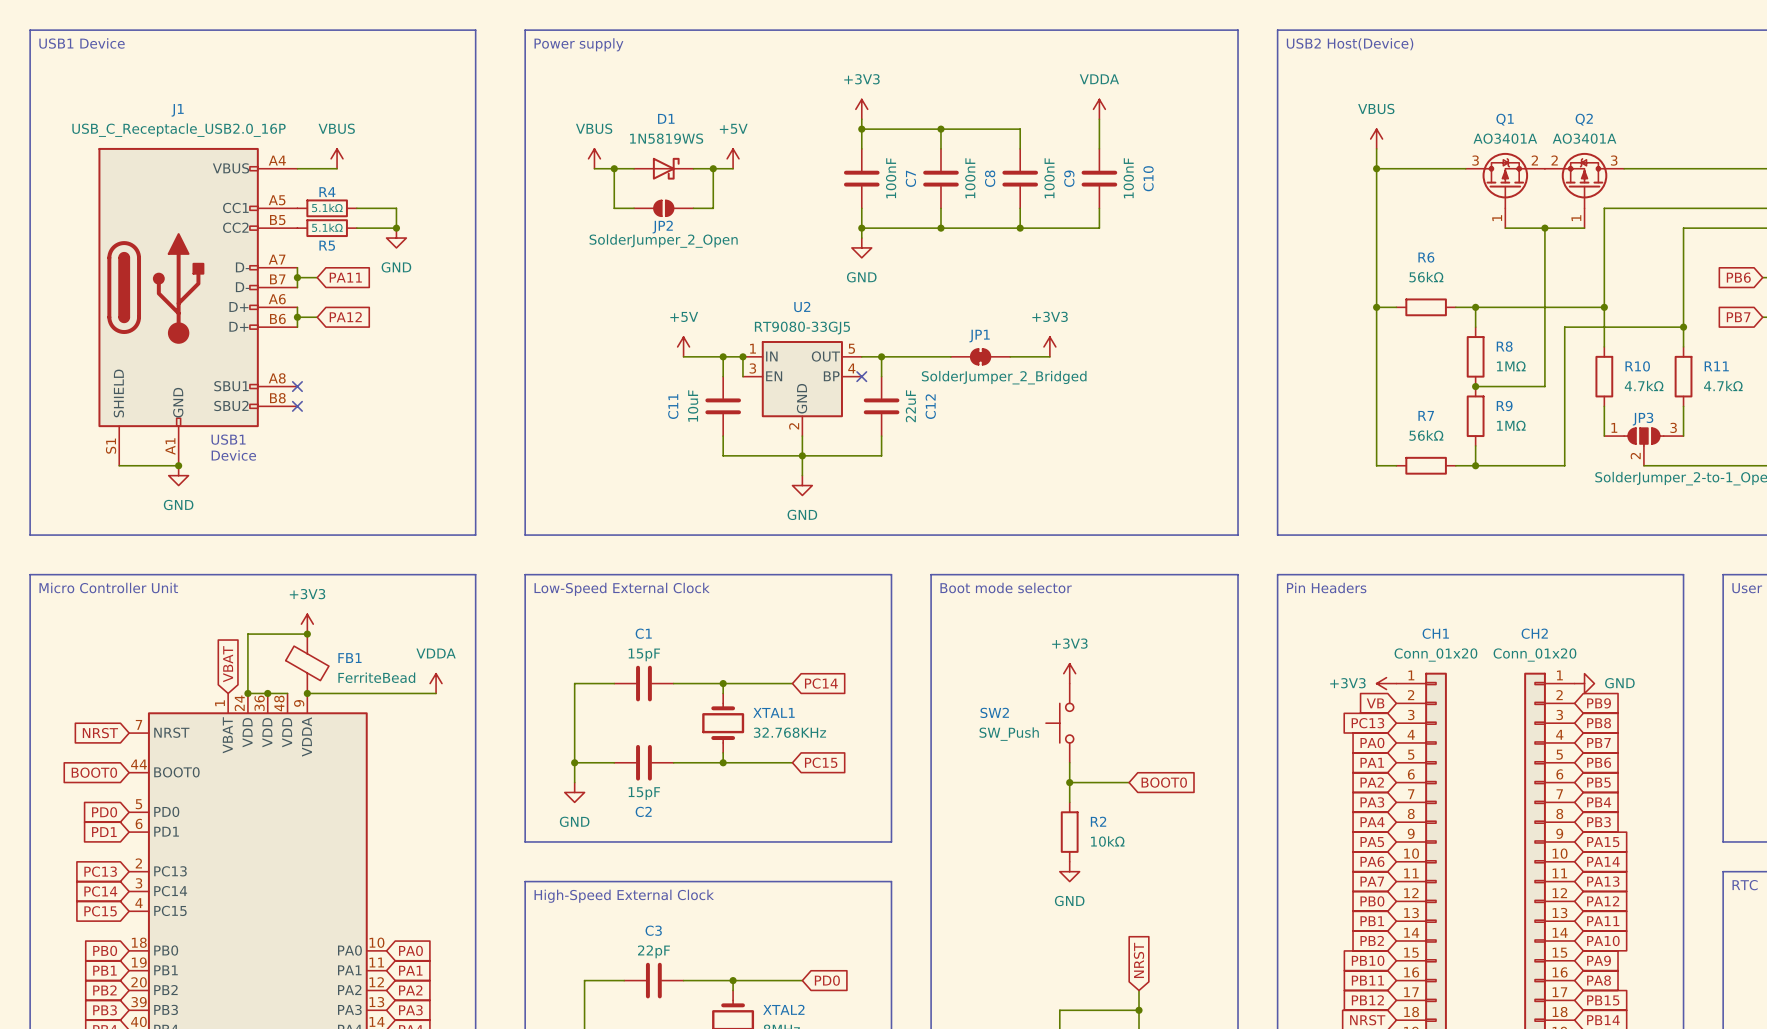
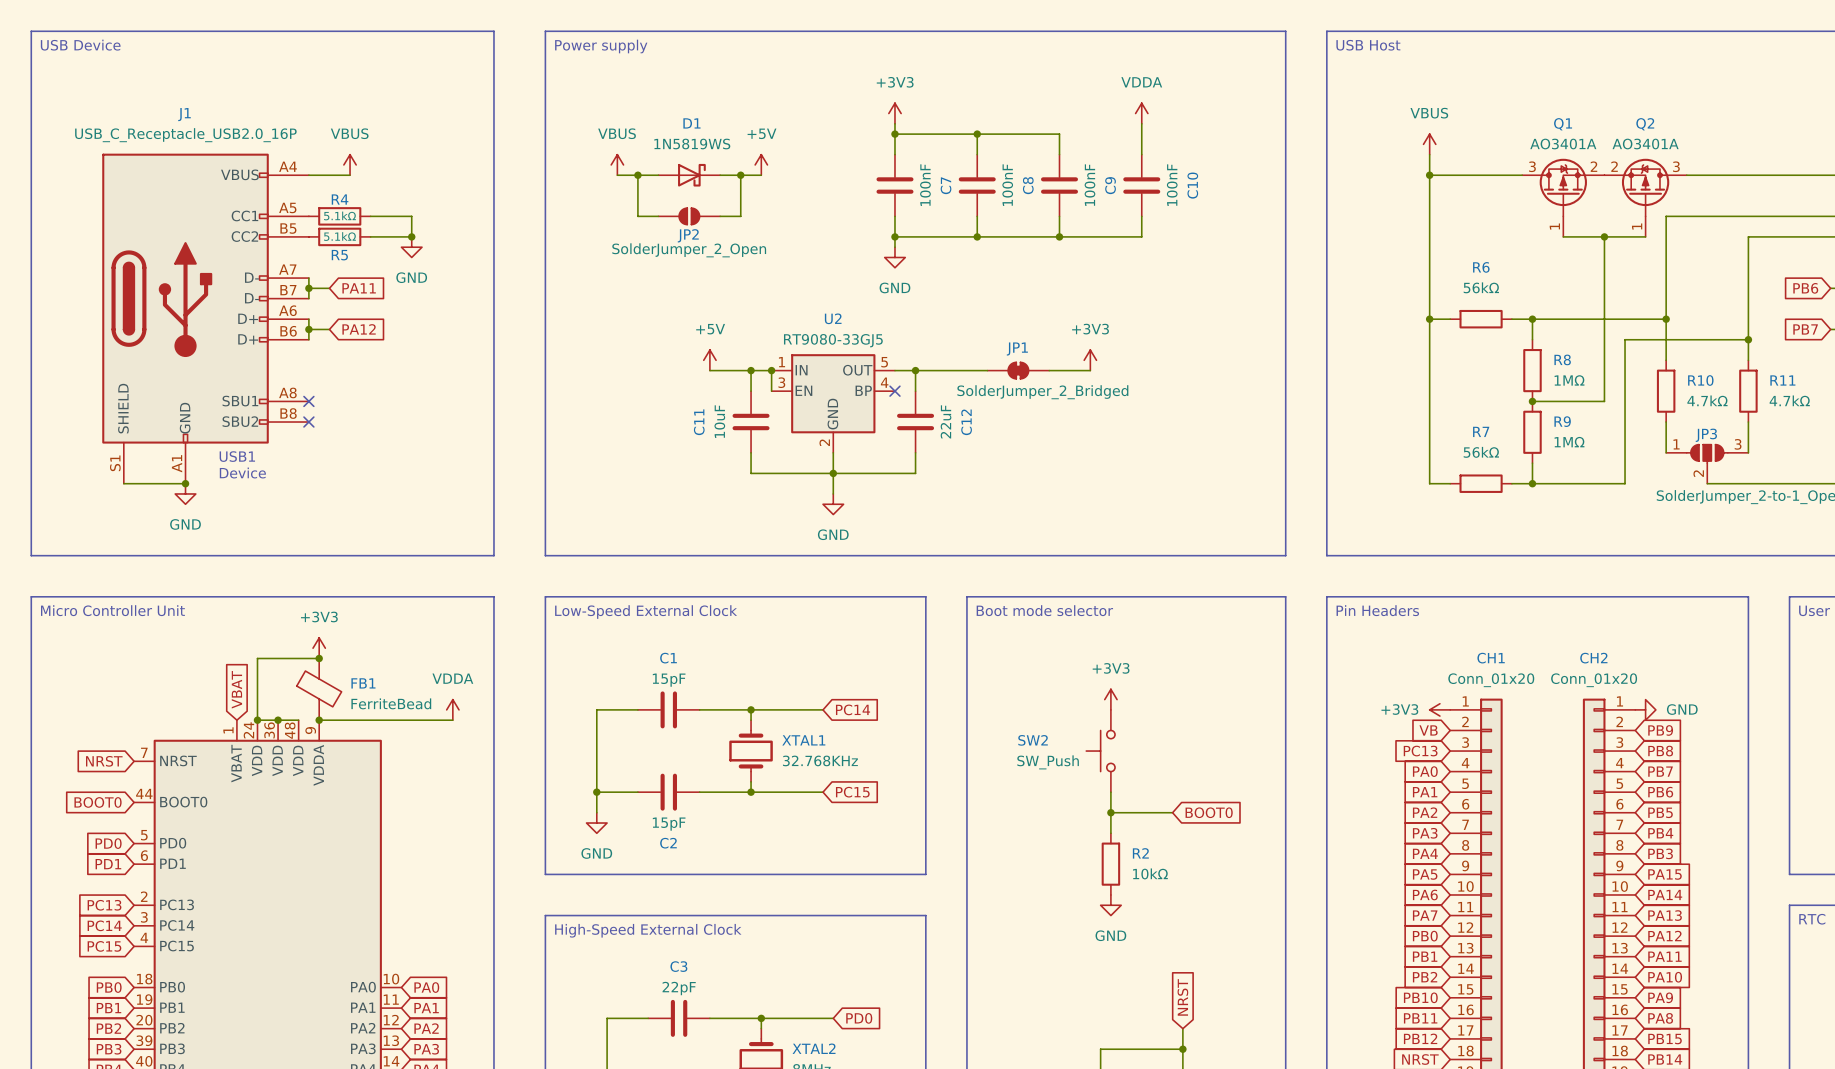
text: USB1 Device (82, 43) -> USB Device (80, 45)
text: USB2 Host(Device) (1350, 44) -> USB Host (1368, 45)

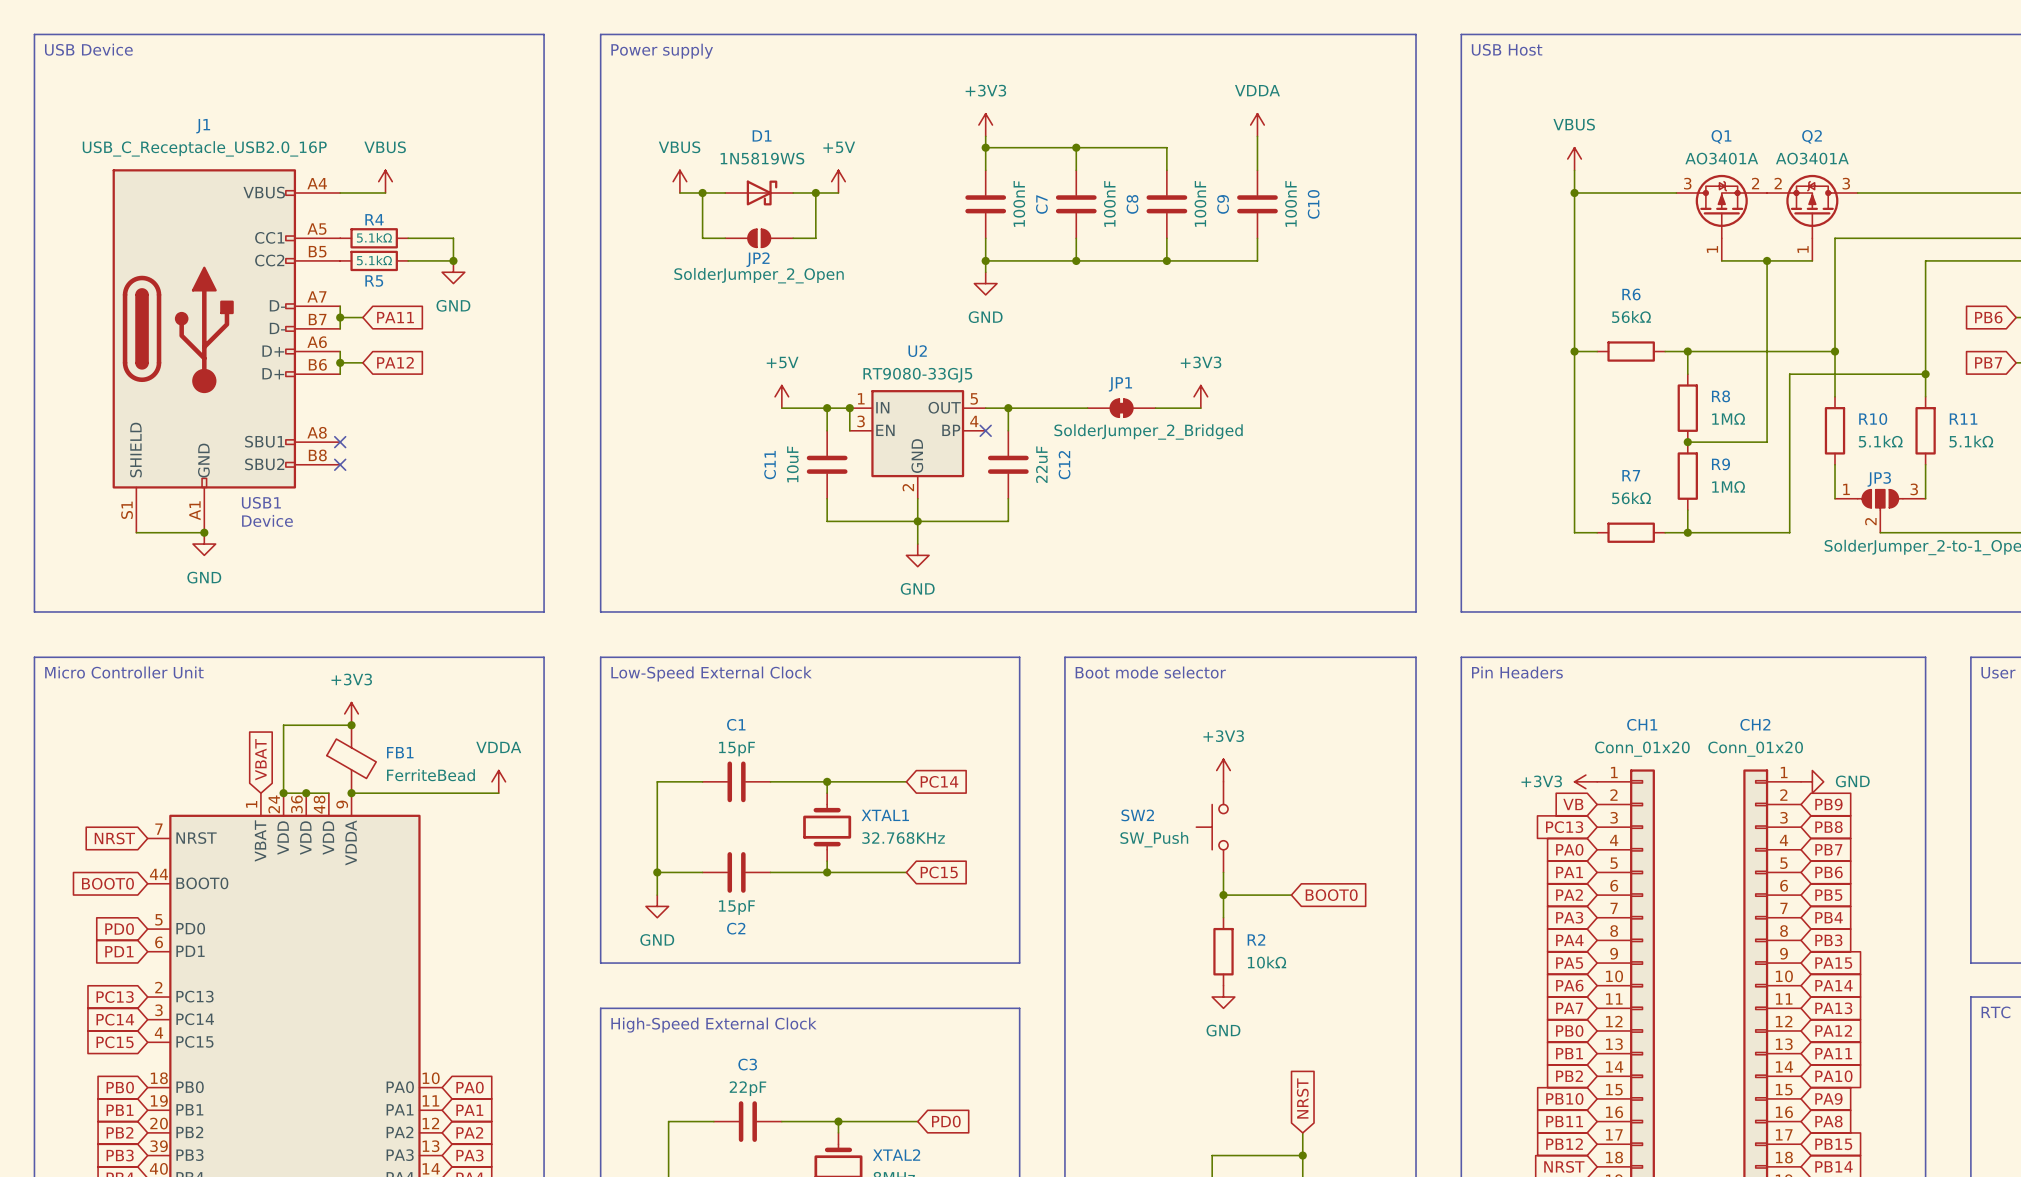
R10 value: 4.7kΩ (1707, 400) -> 5.1kΩ (1880, 441)
R11 value: 4.7kΩ (1789, 400) -> 5.1kΩ (1971, 441)

